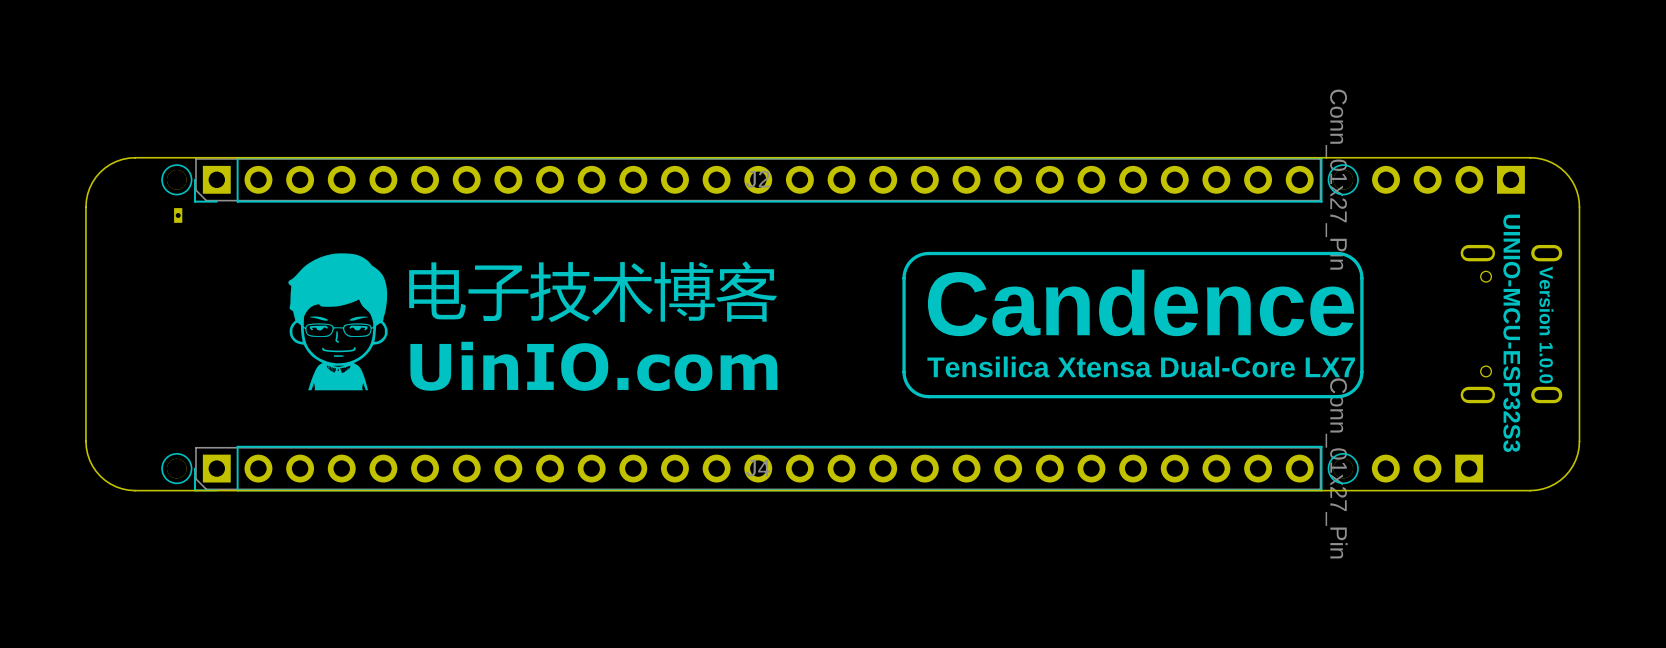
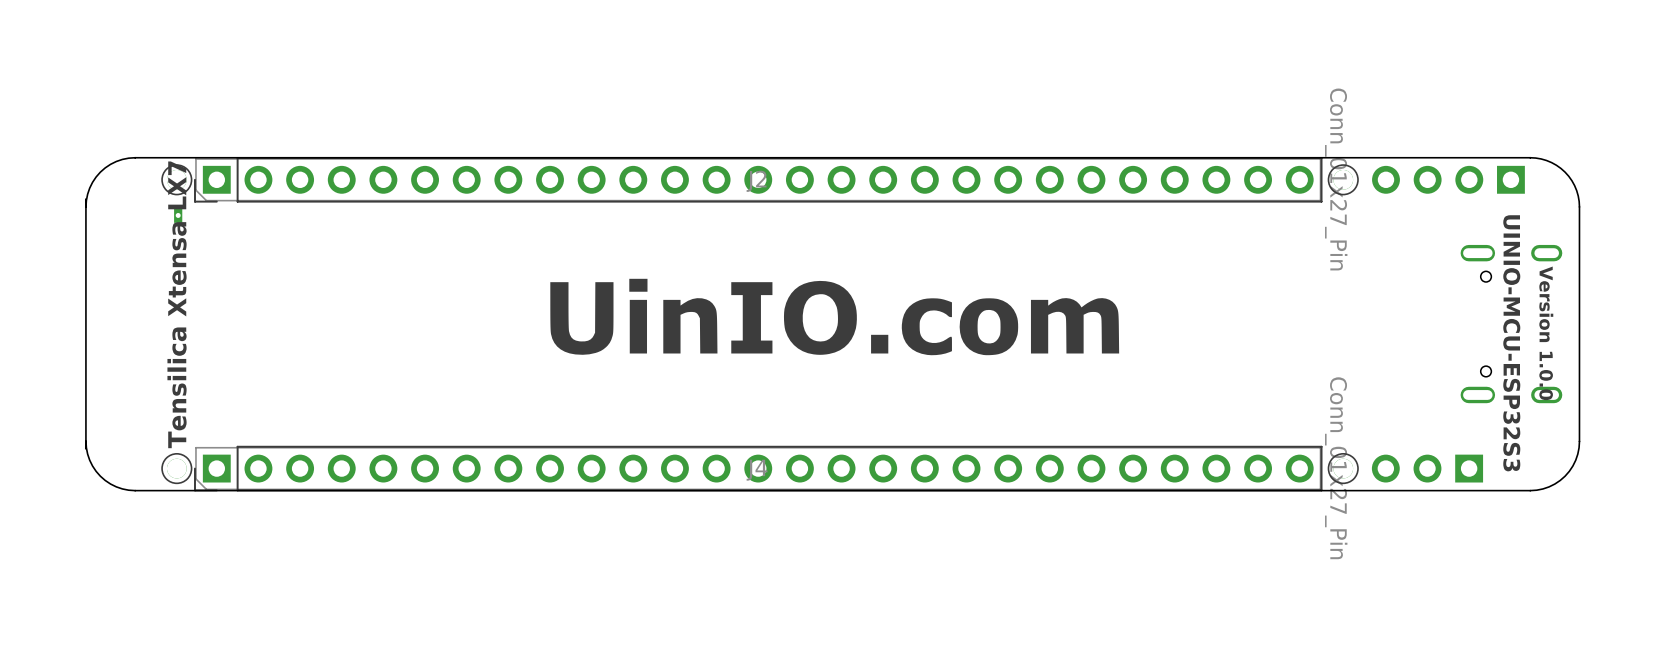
drawing: [288, 253, 778, 392] -> none
line: (1337, 253) (922, 254) (909, 263) (904, 274) (904, 378) (913, 391) (928, 396) (1343, 395) (1356, 387) (1361, 375) (1361, 278) (1360, 268) (1354, 260) (1346, 255) (1337, 253) -> none
drawing: none -> [550, 278, 1120, 356]
text: Candence (1140, 302) -> none
text: none -> Tensilica Xtensa LX7 (177, 304)
text: Tensilica Xtensa Dual-Core LX7 (1141, 366) -> none

